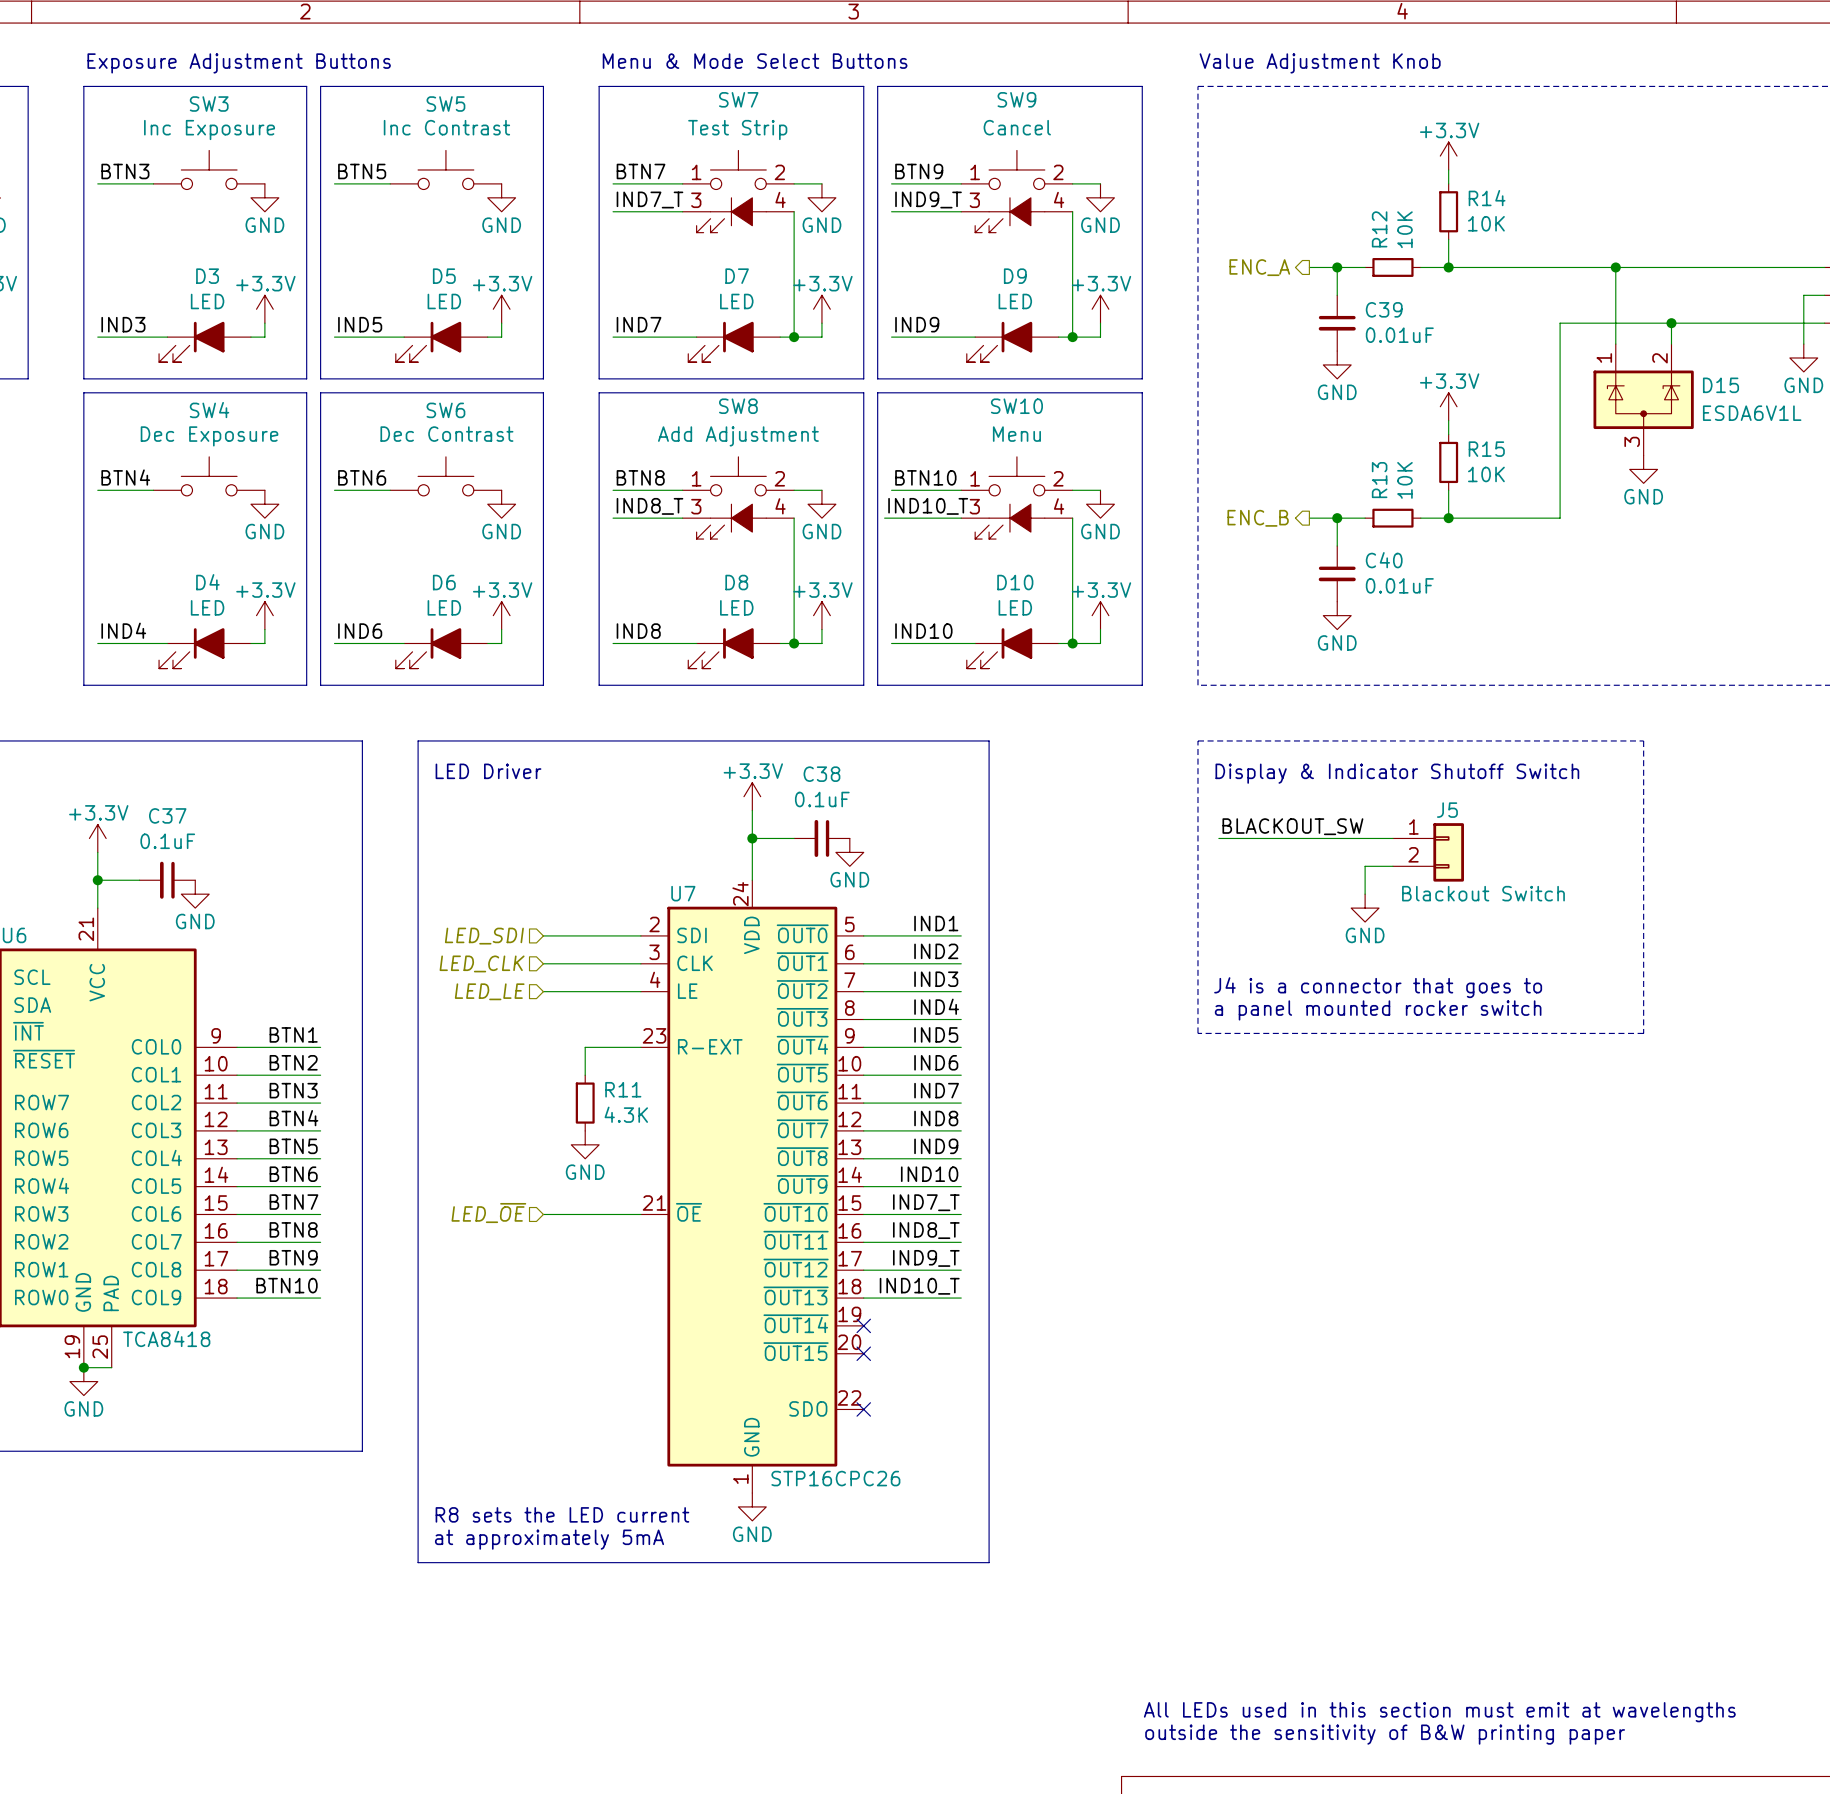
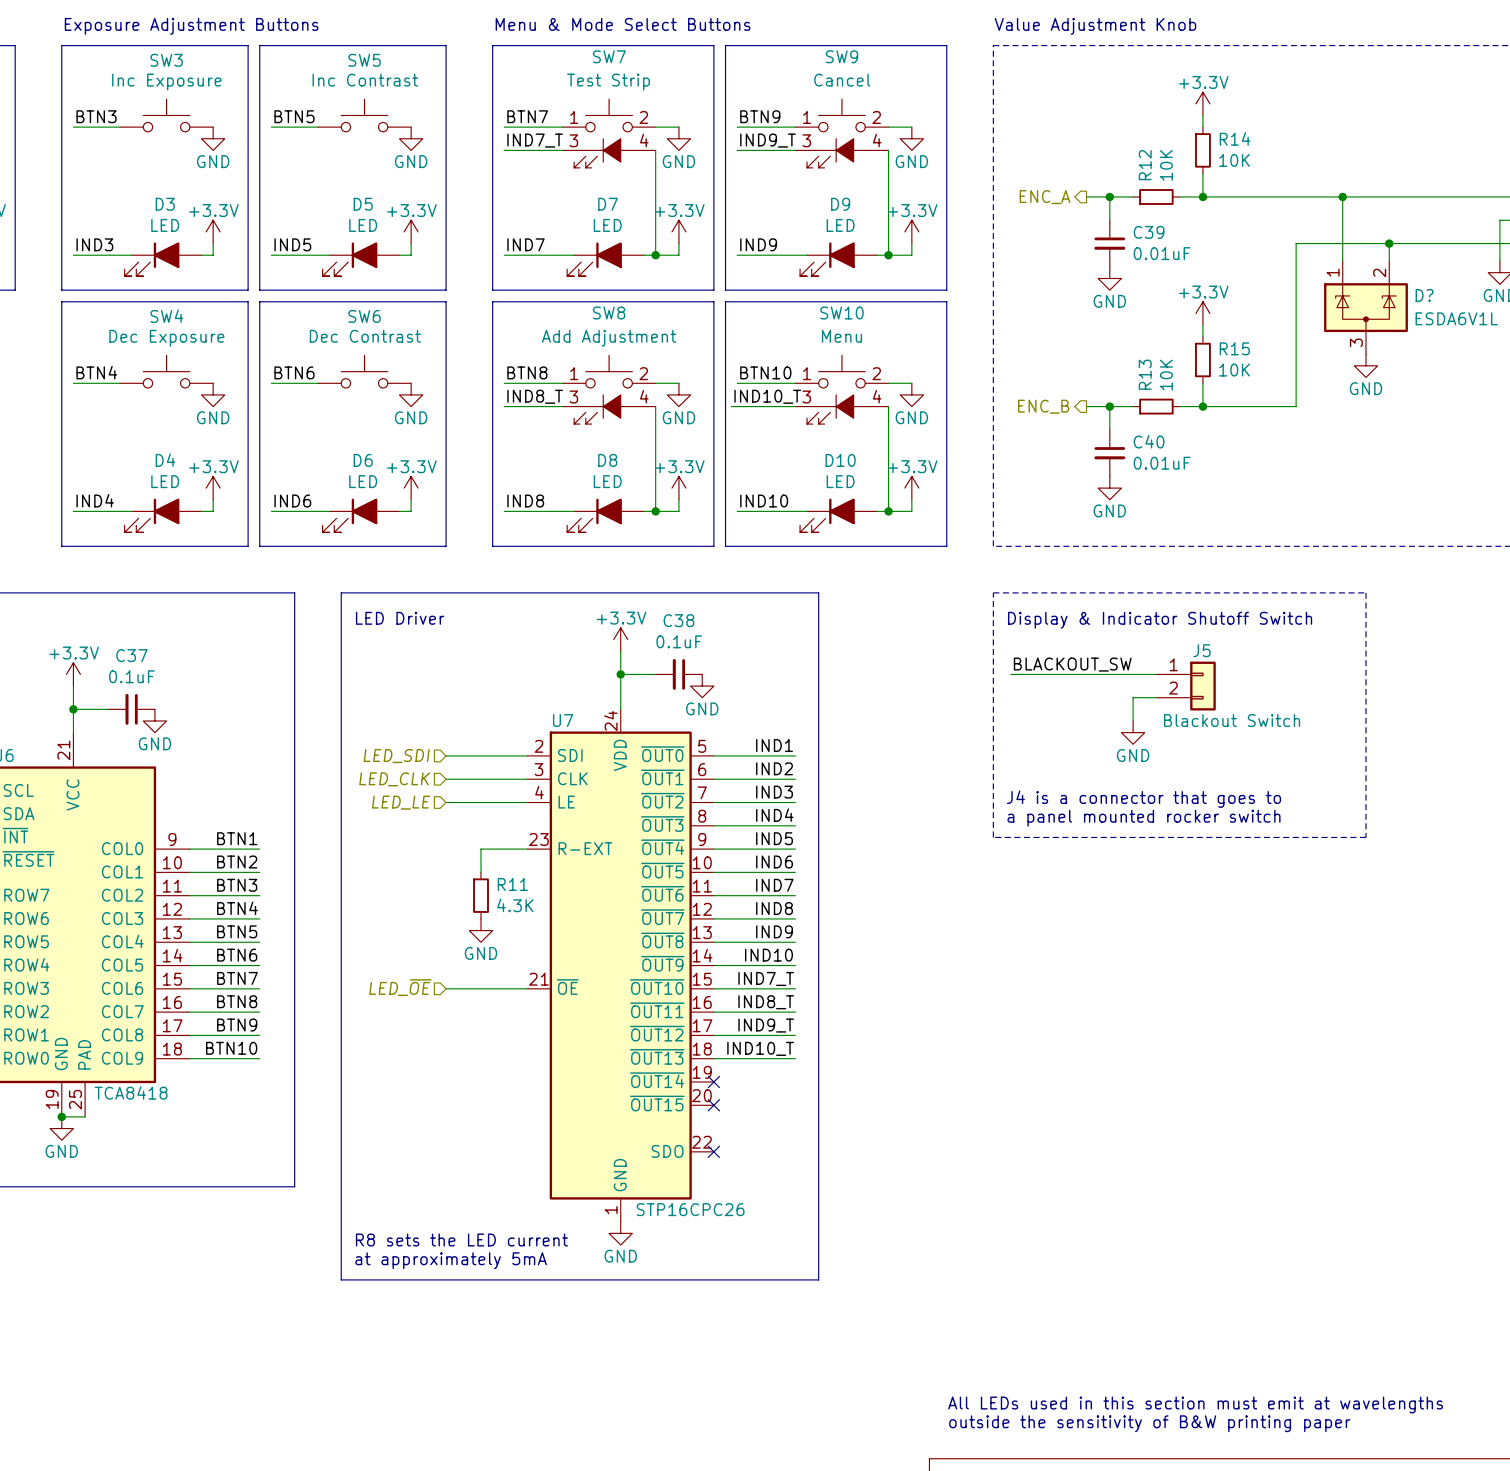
D15 name: D15 (1721, 385) -> D? (1424, 295)

